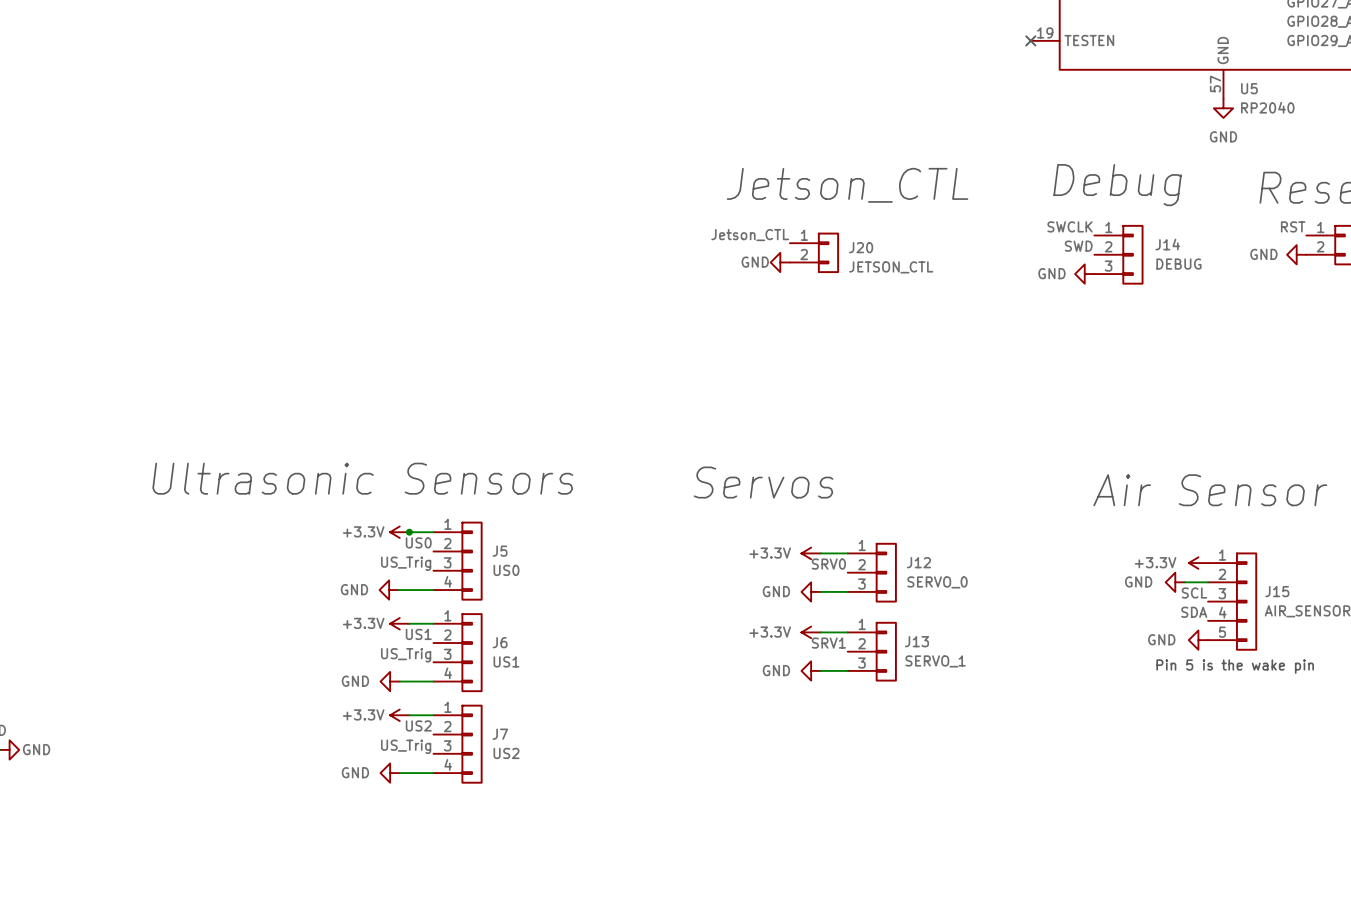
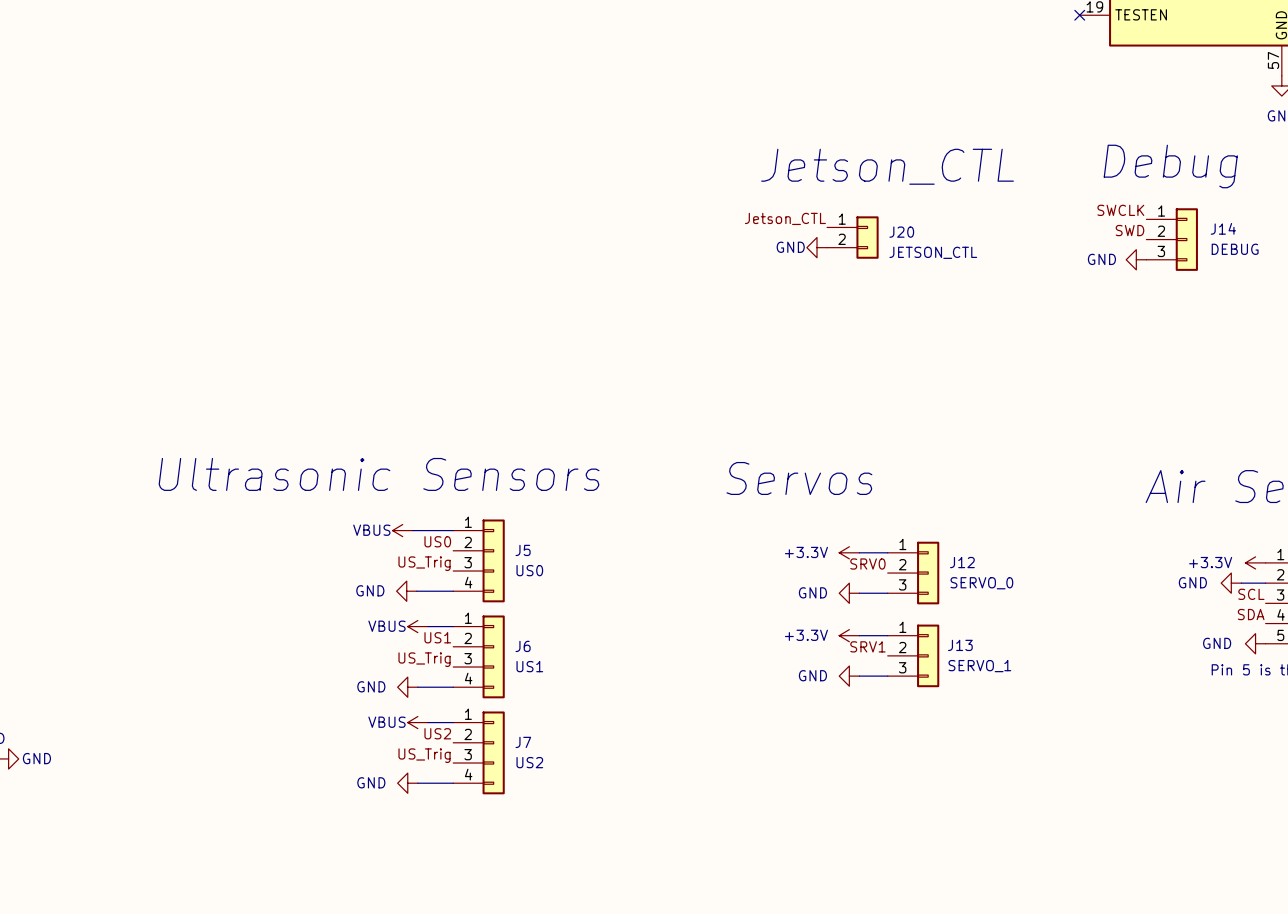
power symbol: none -> VBUS (402, 530)
power symbol: +3.3V (399, 532) -> none
junction: (409, 532) -> none
power symbol: +3.3V (399, 623) -> VBUS (417, 626)
power symbol: +3.3V (399, 715) -> VBUS (417, 722)

